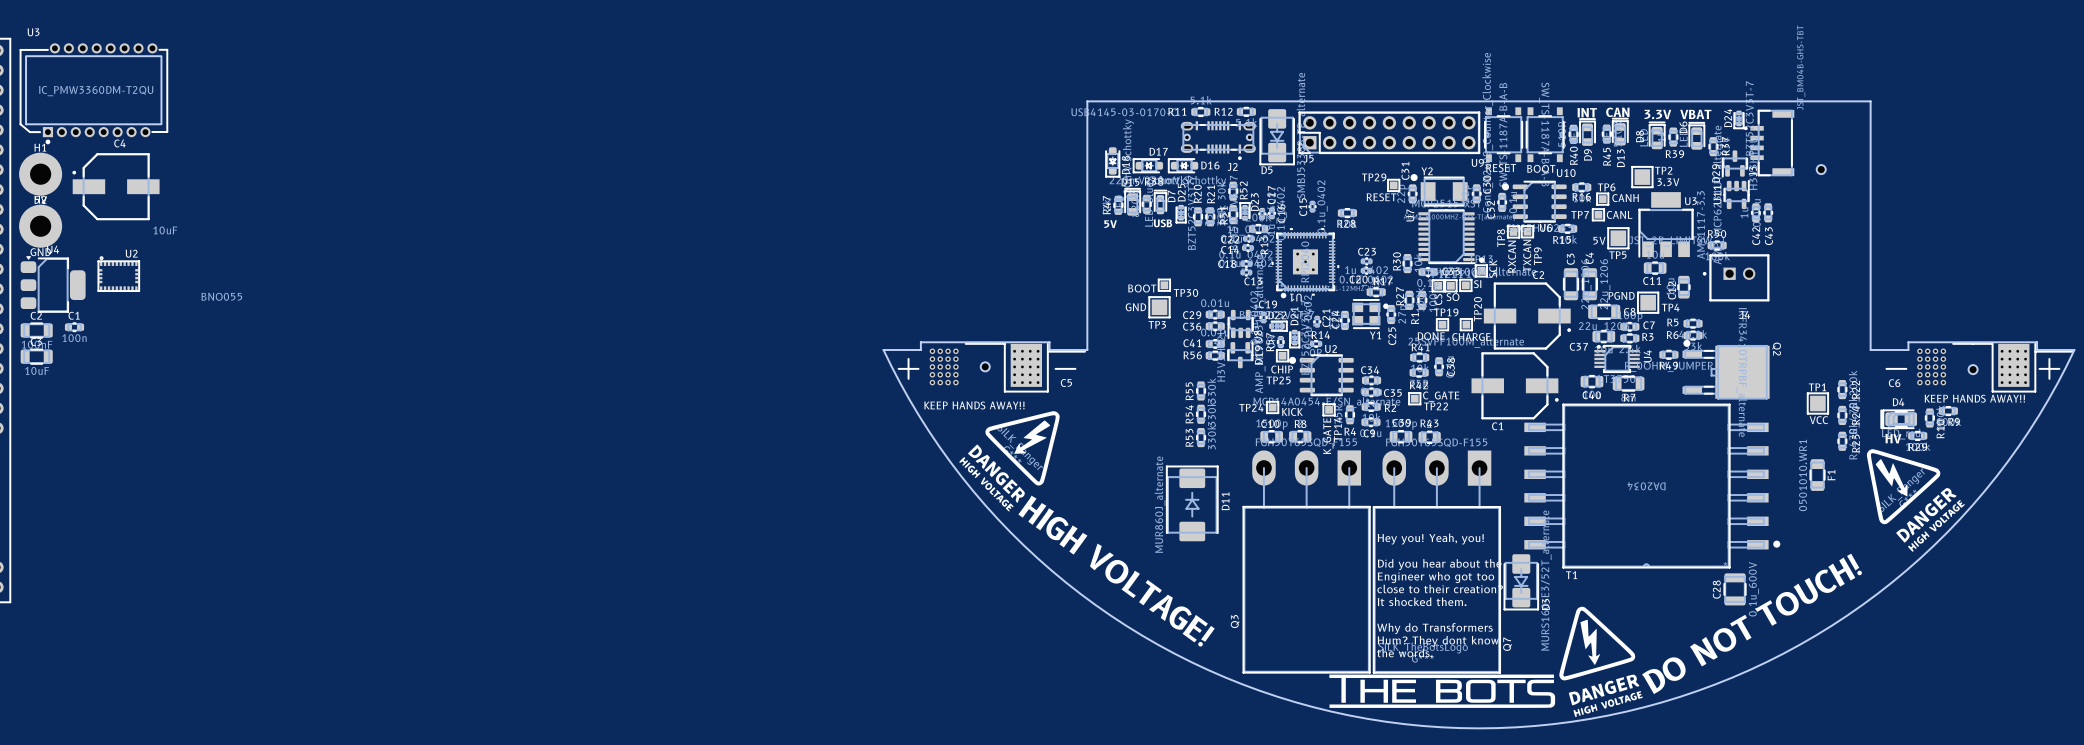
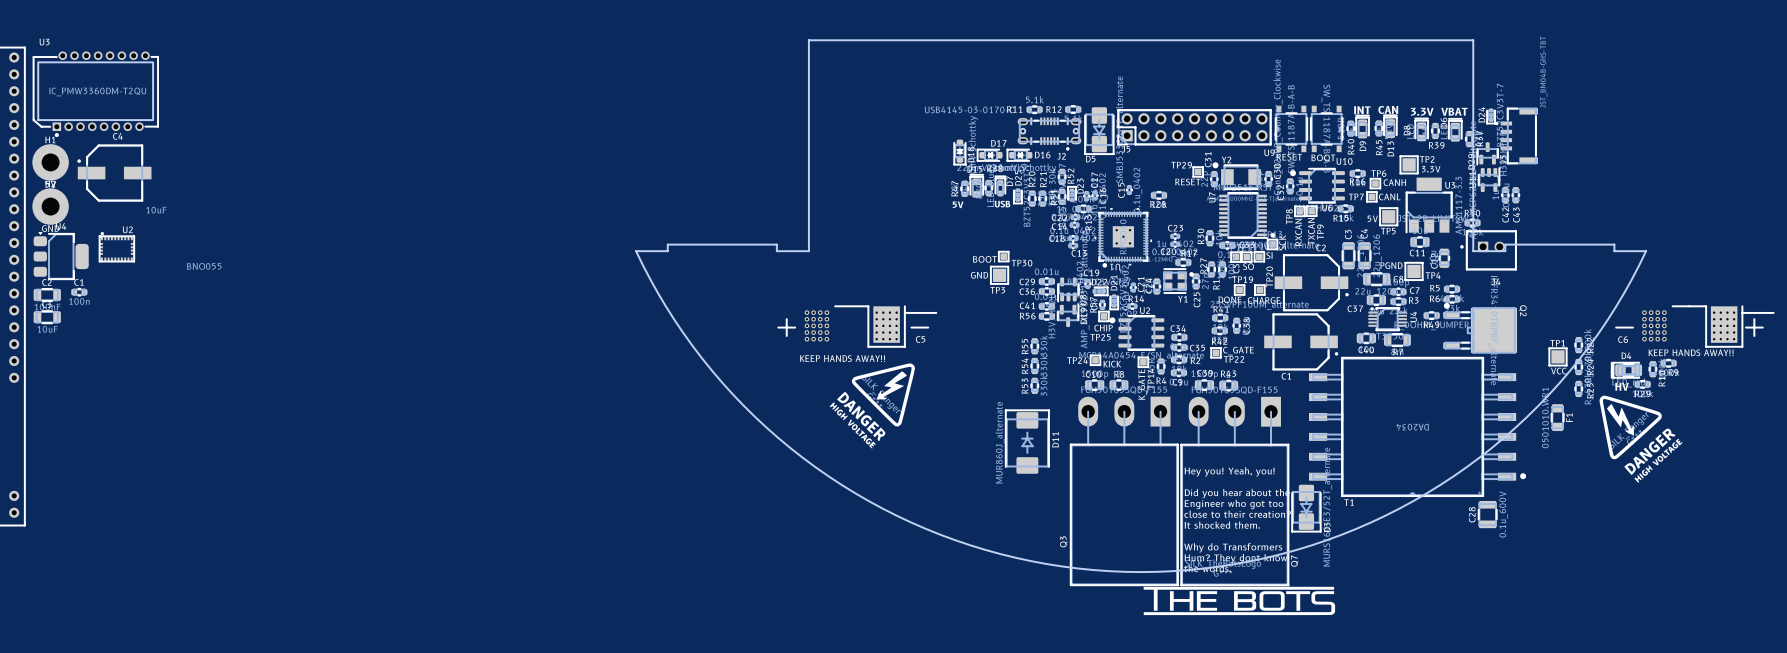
board edge: (1087, 101) (1870, 101) (1870, 350) (1908, 350) (1908, 342) (2037, 342) (2037, 350) (2074, 350) (2048, 399) (2018, 446) (1984, 491) (1947, 532) (1906, 570) (1862, 604) (1815, 635) (1766, 662) (1715, 684) (1644, 707) (1590, 718) (1534, 725) (1478, 728) (1423, 725) (1367, 718) (1313, 707) (1242, 684) (1174, 653) (1110, 615) (1051, 570) (1010, 532) (961, 476) (918, 415) (883, 350) (920, 350) (920, 342) (1049, 342) (1049, 350) (1087, 350) (1087, 101) -> (808, 40) (1473, 40) (1473, 251) (1505, 251) (1505, 244) (1614, 244) (1614, 251) (1646, 251) (1624, 293) (1598, 333) (1570, 370) (1538, 405) (1503, 438) (1466, 467) (1426, 493) (1385, 515) (1326, 540) (1281, 554) (1235, 564) (1188, 570) (1141, 572) (1093, 570) (1046, 564) (1000, 554) (955, 540) (897, 515) (841, 485) (790, 448) (743, 405) (702, 358) (666, 306) (636, 251) (667, 251) (667, 244) (776, 244) (776, 251) (808, 251) (808, 40)
part: (1821, 169) -> none
part: (985, 366) -> none
part: (1973, 369) -> none
text: HIGH VOLTAGE! (1116, 571) -> none
drawing: [1559, 606, 1643, 718] -> none
text: DO NOT TOUCH! (1751, 623) -> none

